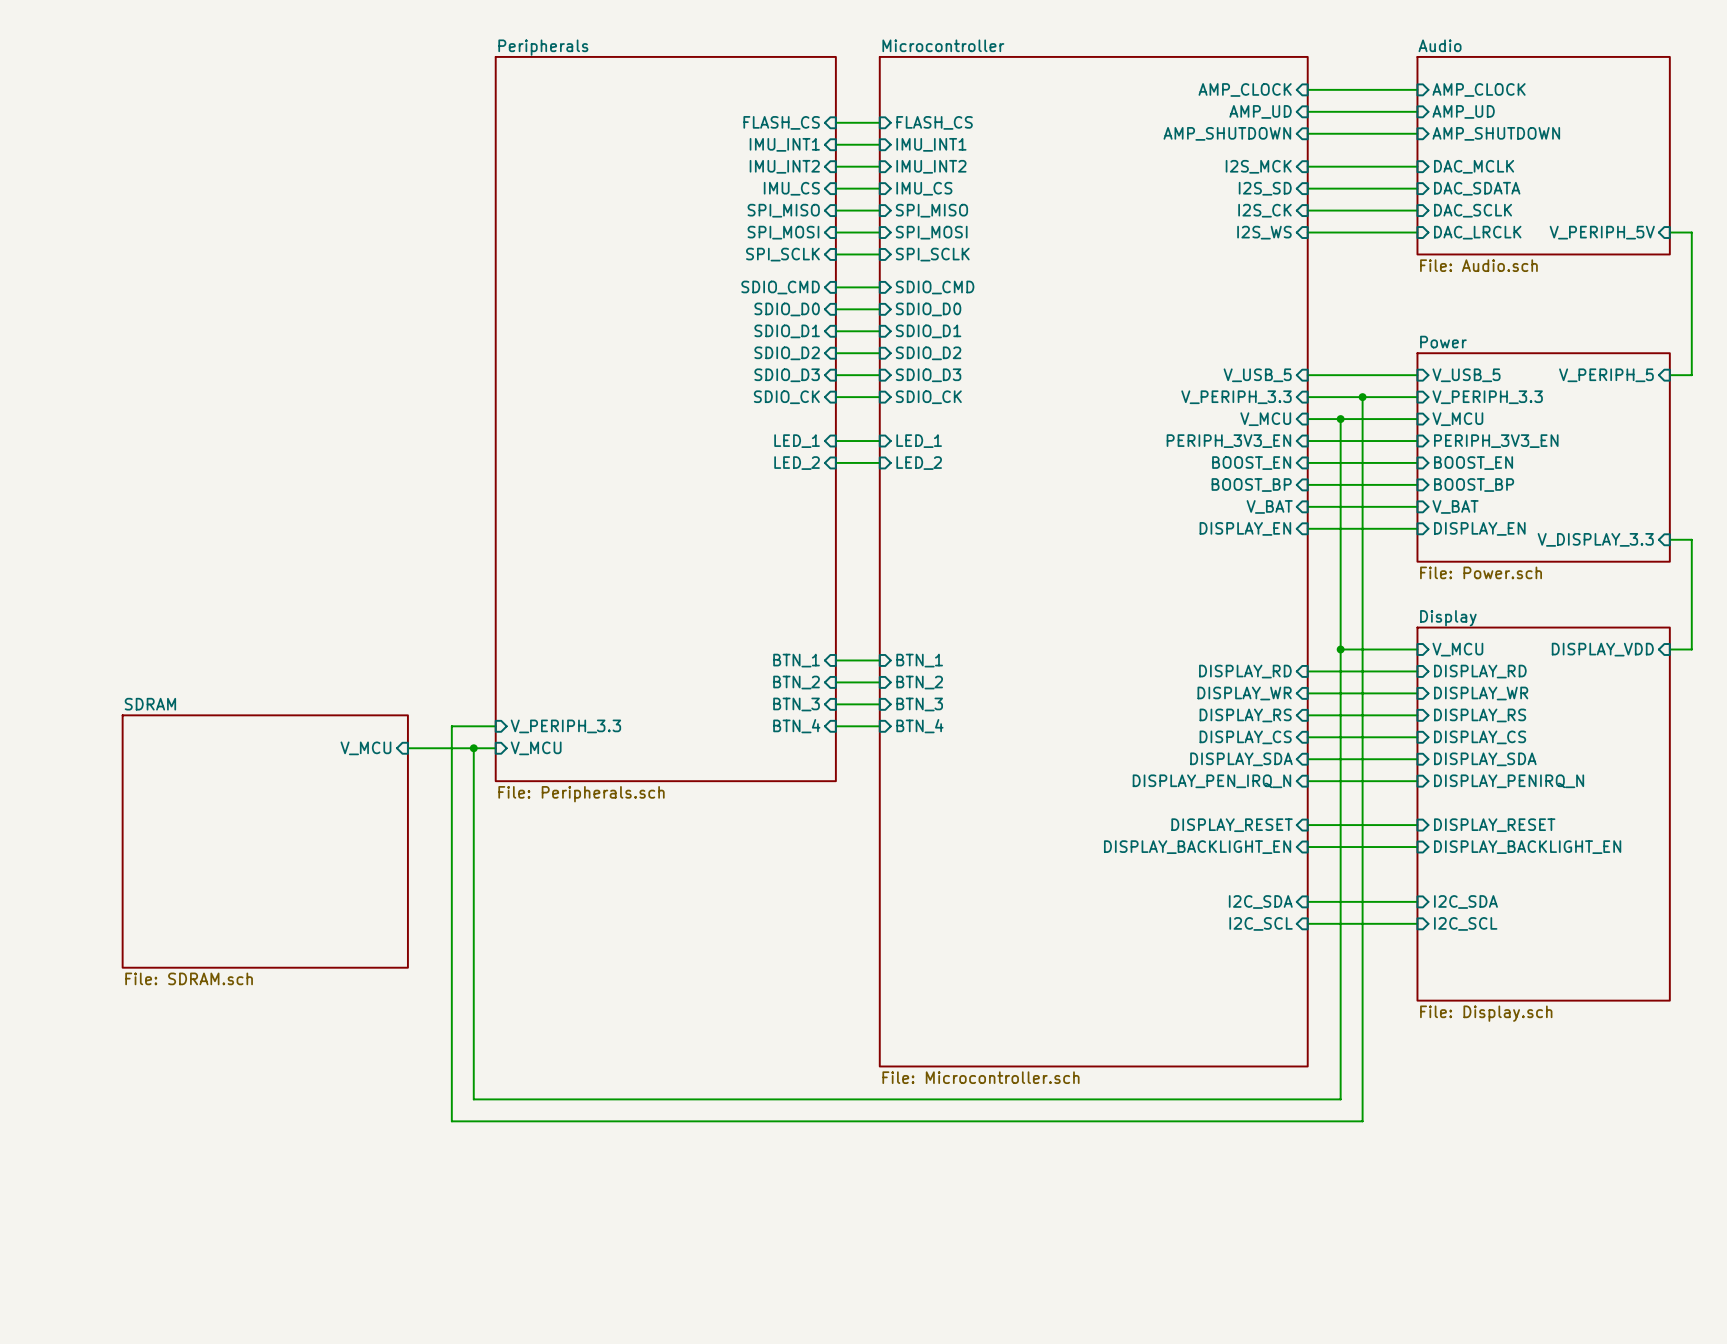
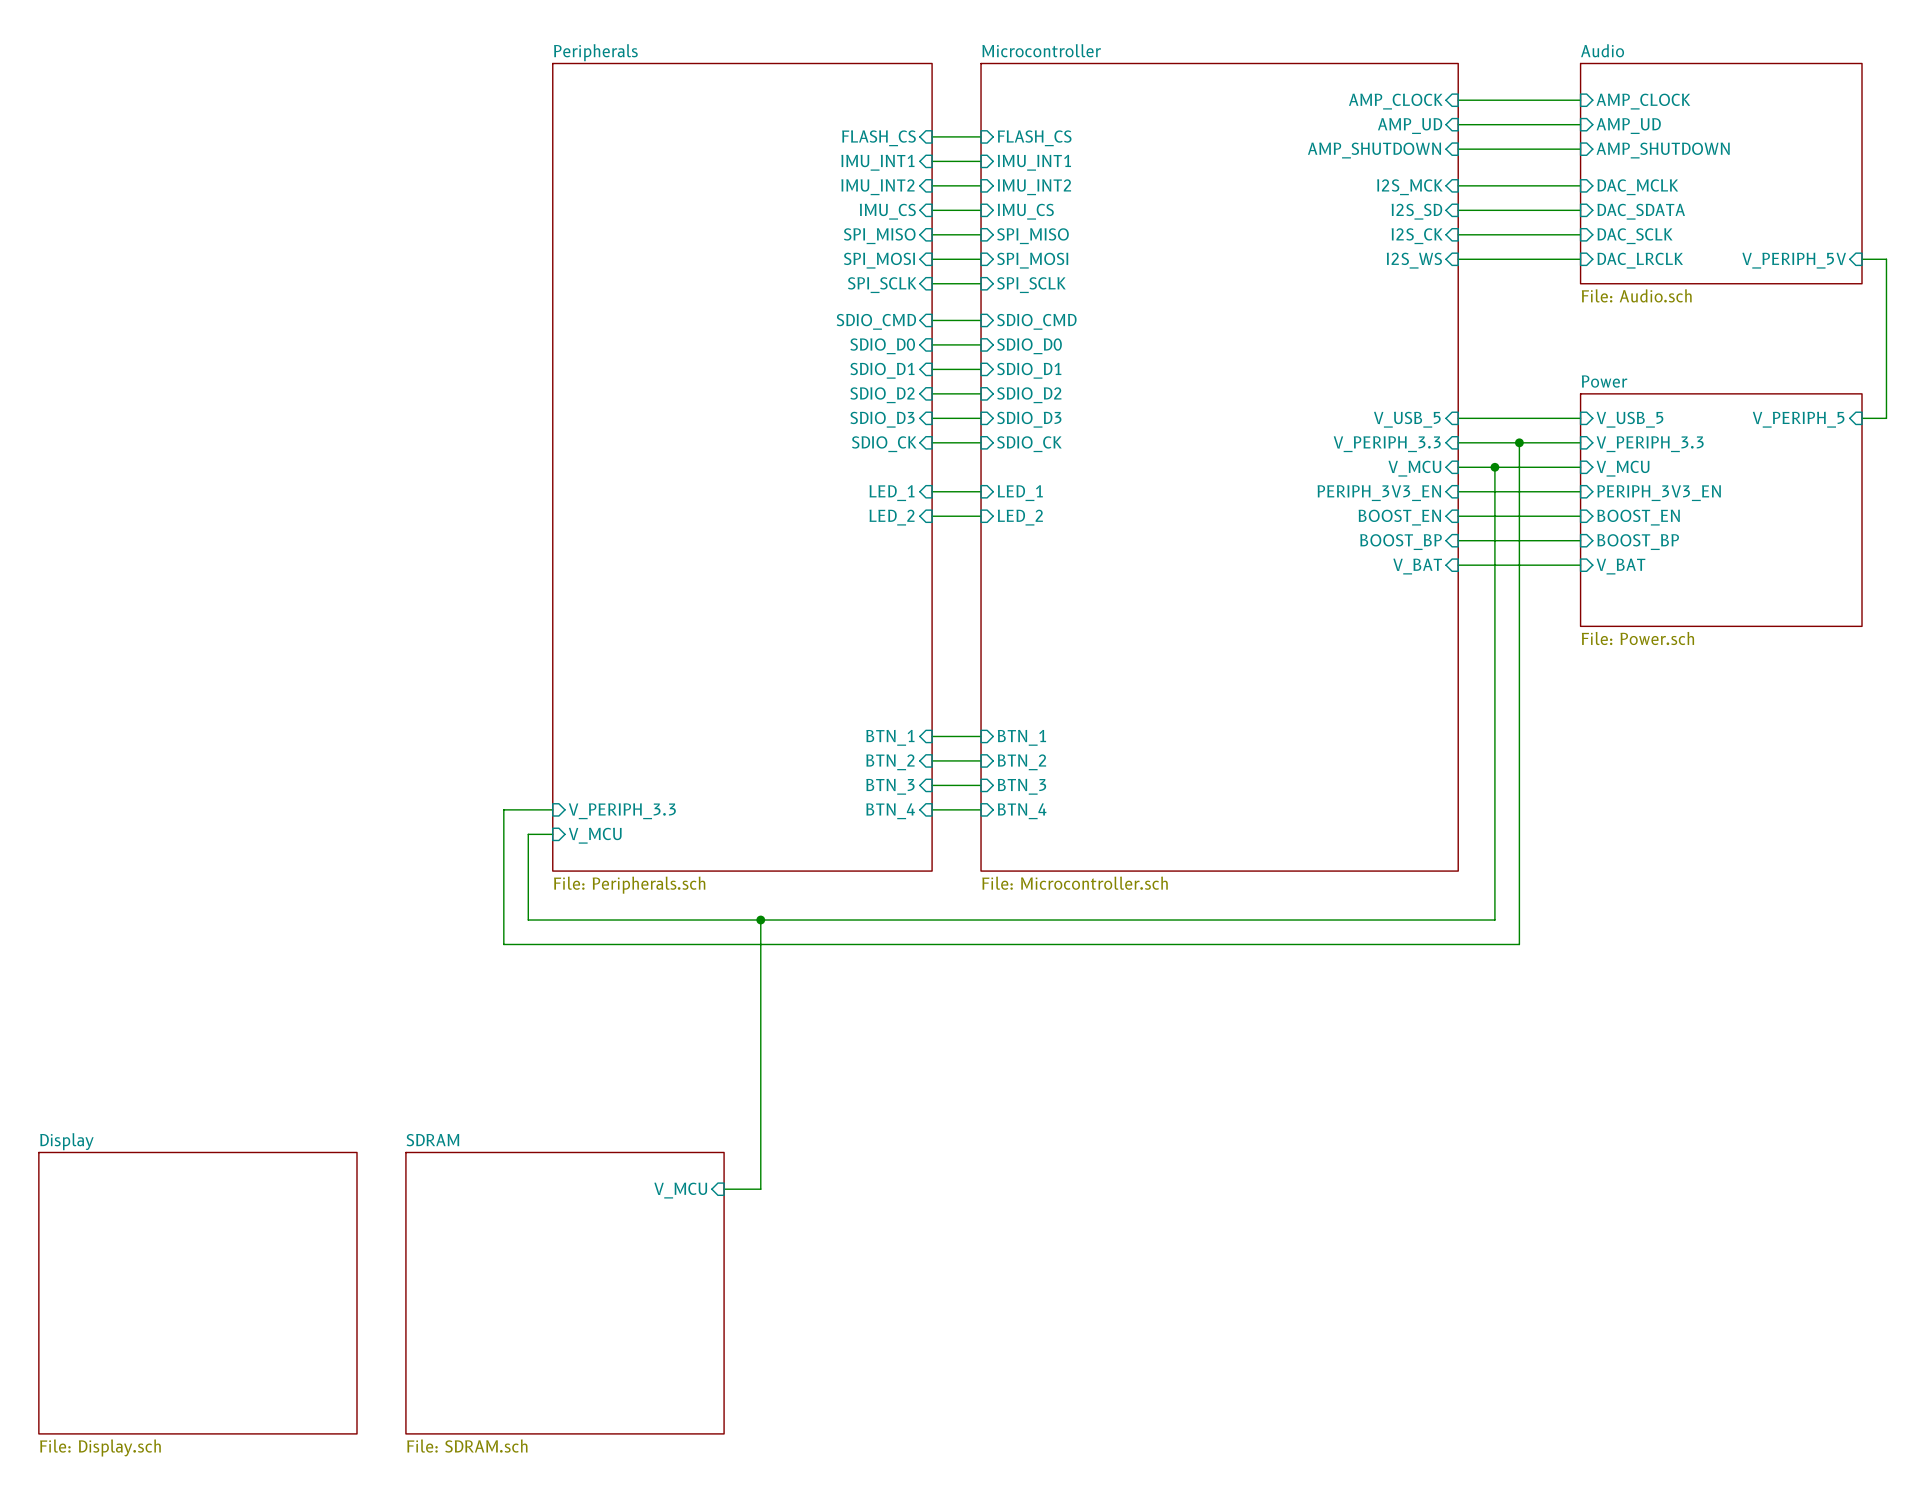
sheet Microcontroller: none -> File: Microcontroller.sch (1219, 467)
sheet pin: DISPLAY_EN (1245, 528) -> none
wire: (1307, 528) (1417, 528) -> none
sheet pin: DISPLAY_EN (1479, 528) -> none
sheet pin: V_DISPLAY_3.3 (1595, 539) -> none
wire: (1669, 539) (1691, 539) (1691, 649) (1669, 649) -> none
sheet Microcontroller: File: Microcontroller.sch (1093, 561) -> none
wire: (1340, 649) (1417, 649) -> none
junction: (1340, 649) -> none
sheet pin: V_MCU (1457, 649) -> none
sheet pin: DISPLAY_VDD (1602, 649) -> none
sheet pin: DISPLAY_RD (1245, 671) -> none
wire: (1307, 671) (1417, 671) -> none
sheet pin: DISPLAY_RD (1480, 671) -> none
sheet pin: DISPLAY_WR (1244, 693) -> none
wire: (1307, 693) (1417, 693) -> none
sheet pin: DISPLAY_WR (1481, 693) -> none
sheet pin: DISPLAY_RS (1245, 715) -> none
wire: (1307, 715) (1417, 715) -> none
sheet pin: DISPLAY_RS (1480, 715) -> none
sheet pin: DISPLAY_CS (1245, 737) -> none
wire: (1307, 737) (1417, 737) -> none
sheet pin: DISPLAY_CS (1480, 737) -> none
sheet pin: V_MCU (365, 748) -> none
wire: (407, 748) (473, 748) -> none
junction: (473, 748) -> none
sheet pin: DISPLAY_SDA (1241, 759) -> none
wire: (1307, 759) (1417, 759) -> none
sheet pin: DISPLAY_SDA (1485, 759) -> none
sheet pin: DISPLAY_PEN_IRQ_N (1211, 781) -> none
wire: (1307, 781) (1417, 781) -> none
sheet pin: DISPLAY_PENIRQ_N (1509, 781) -> none
sheet Display: File: Display.sch (1543, 814) -> none
wire: (473, 825) (473, 1099) (1340, 1099) (1340, 825) (1417, 825) -> (528, 920) (1458, 920)
wire: none -> (760, 920) (760, 1189) (724, 1189)
junction: none -> (760, 920)
sheet pin: DISPLAY_RESET (1232, 825) -> none
sheet pin: DISPLAY_RESET (1494, 825) -> none
sheet SDRAM: File: SDRAM.sch (265, 841) -> none
wire: (451, 847) (451, 1121) (1362, 1121) (1362, 847) (1417, 847) -> (503, 944) (1458, 944)
sheet pin: DISPLAY_BACKLIGHT_EN (1197, 847) -> none
sheet pin: DISPLAY_BACKLIGHT_EN (1527, 847) -> none
sheet pin: I2C_SDA (1260, 901) -> none
wire: (1307, 901) (1417, 901) -> none
sheet pin: I2C_SDA (1465, 901) -> none
sheet pin: I2C_SCL (1261, 923) -> none
wire: (1307, 923) (1417, 923) -> none
sheet pin: I2C_SCL (1465, 923) -> none
sheet pin: none -> V_MCU (680, 1190)
sheet Display: none -> File: Display.sch (197, 1293)
sheet SDRAM: none -> File: SDRAM.sch (565, 1293)

